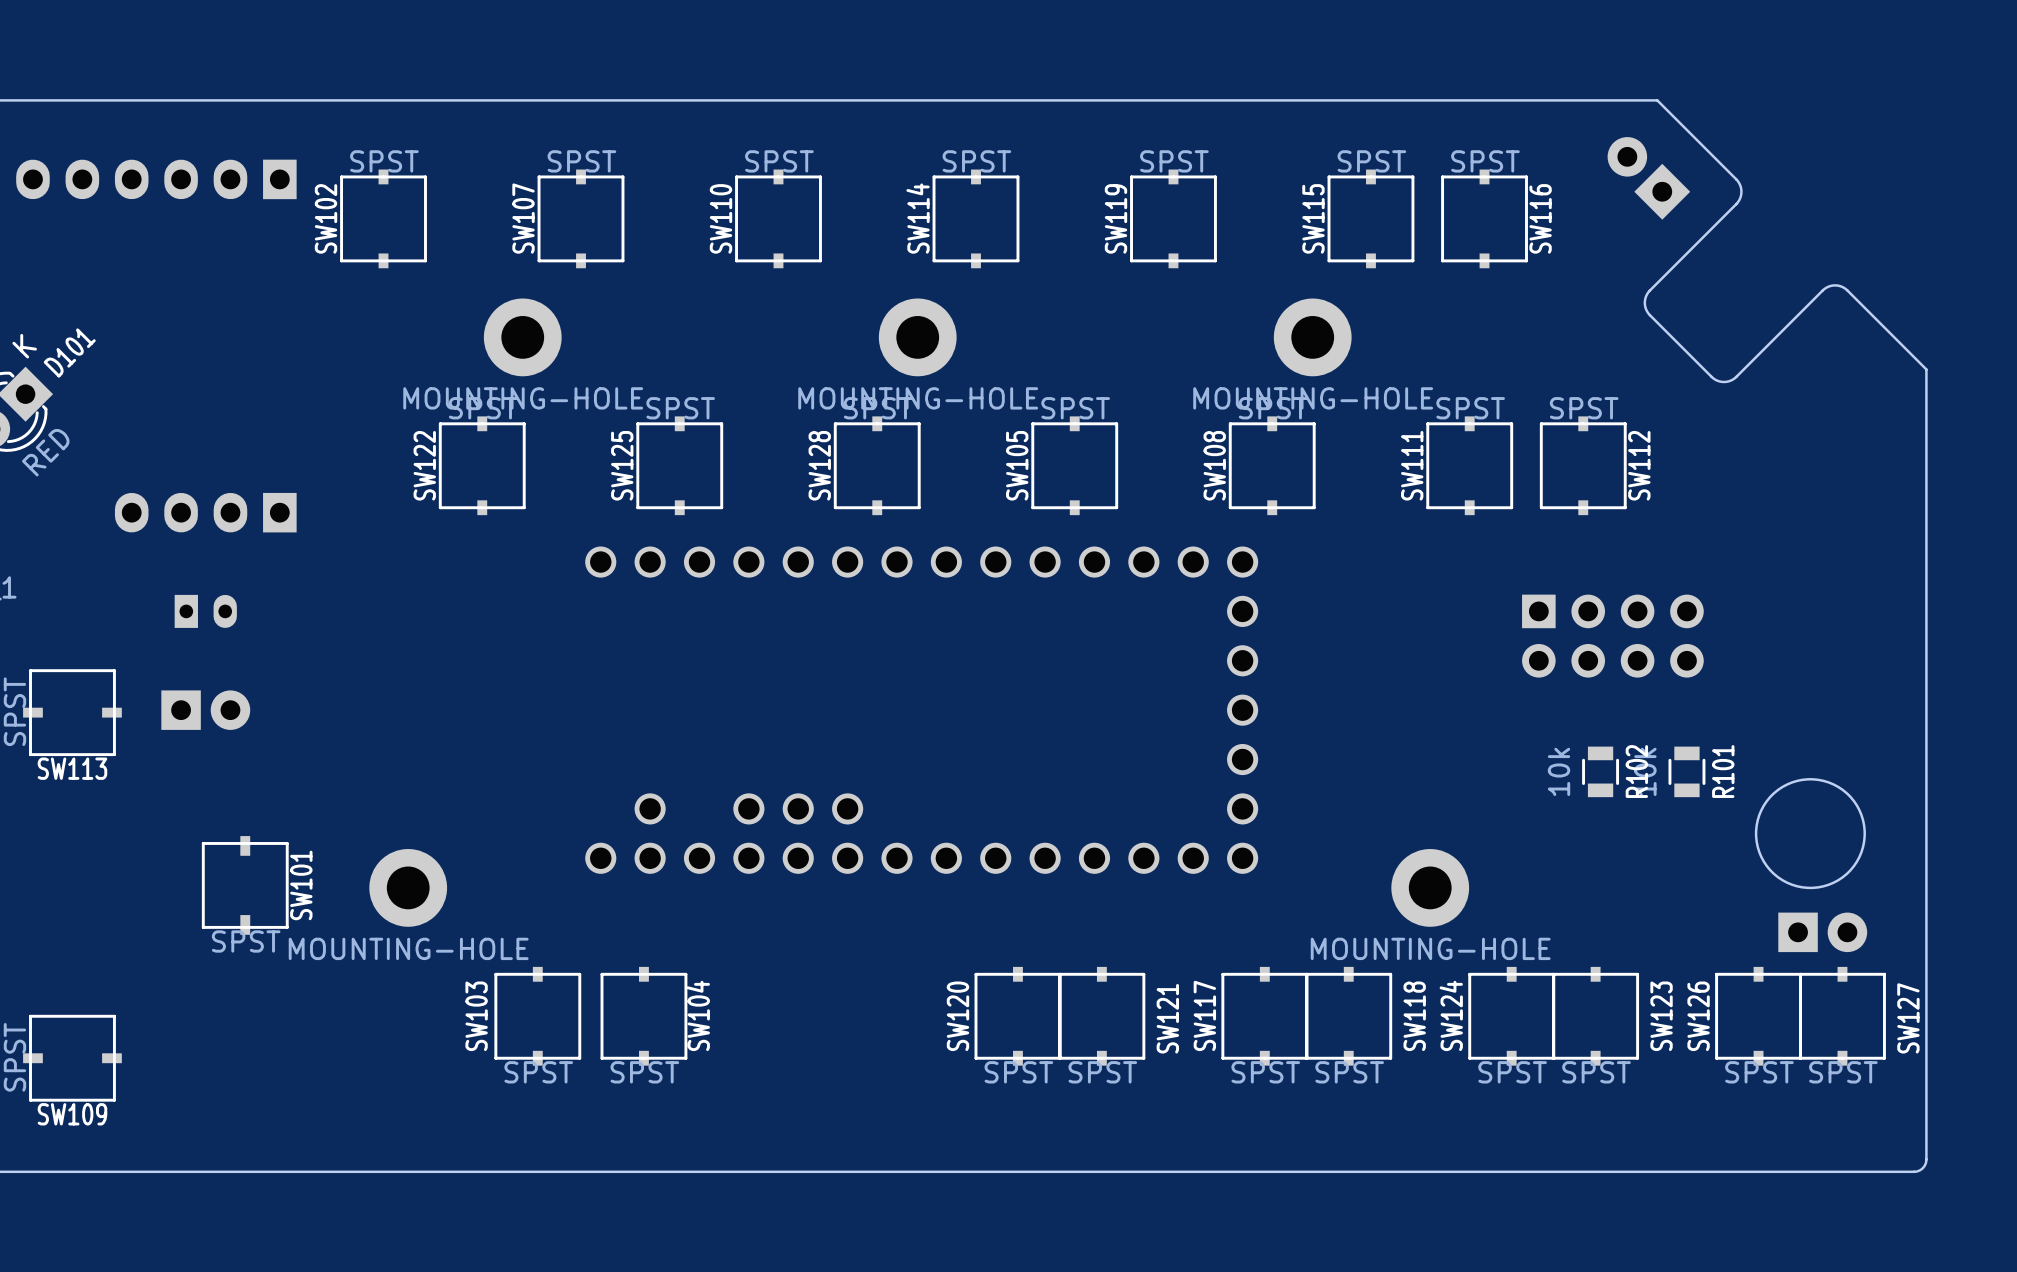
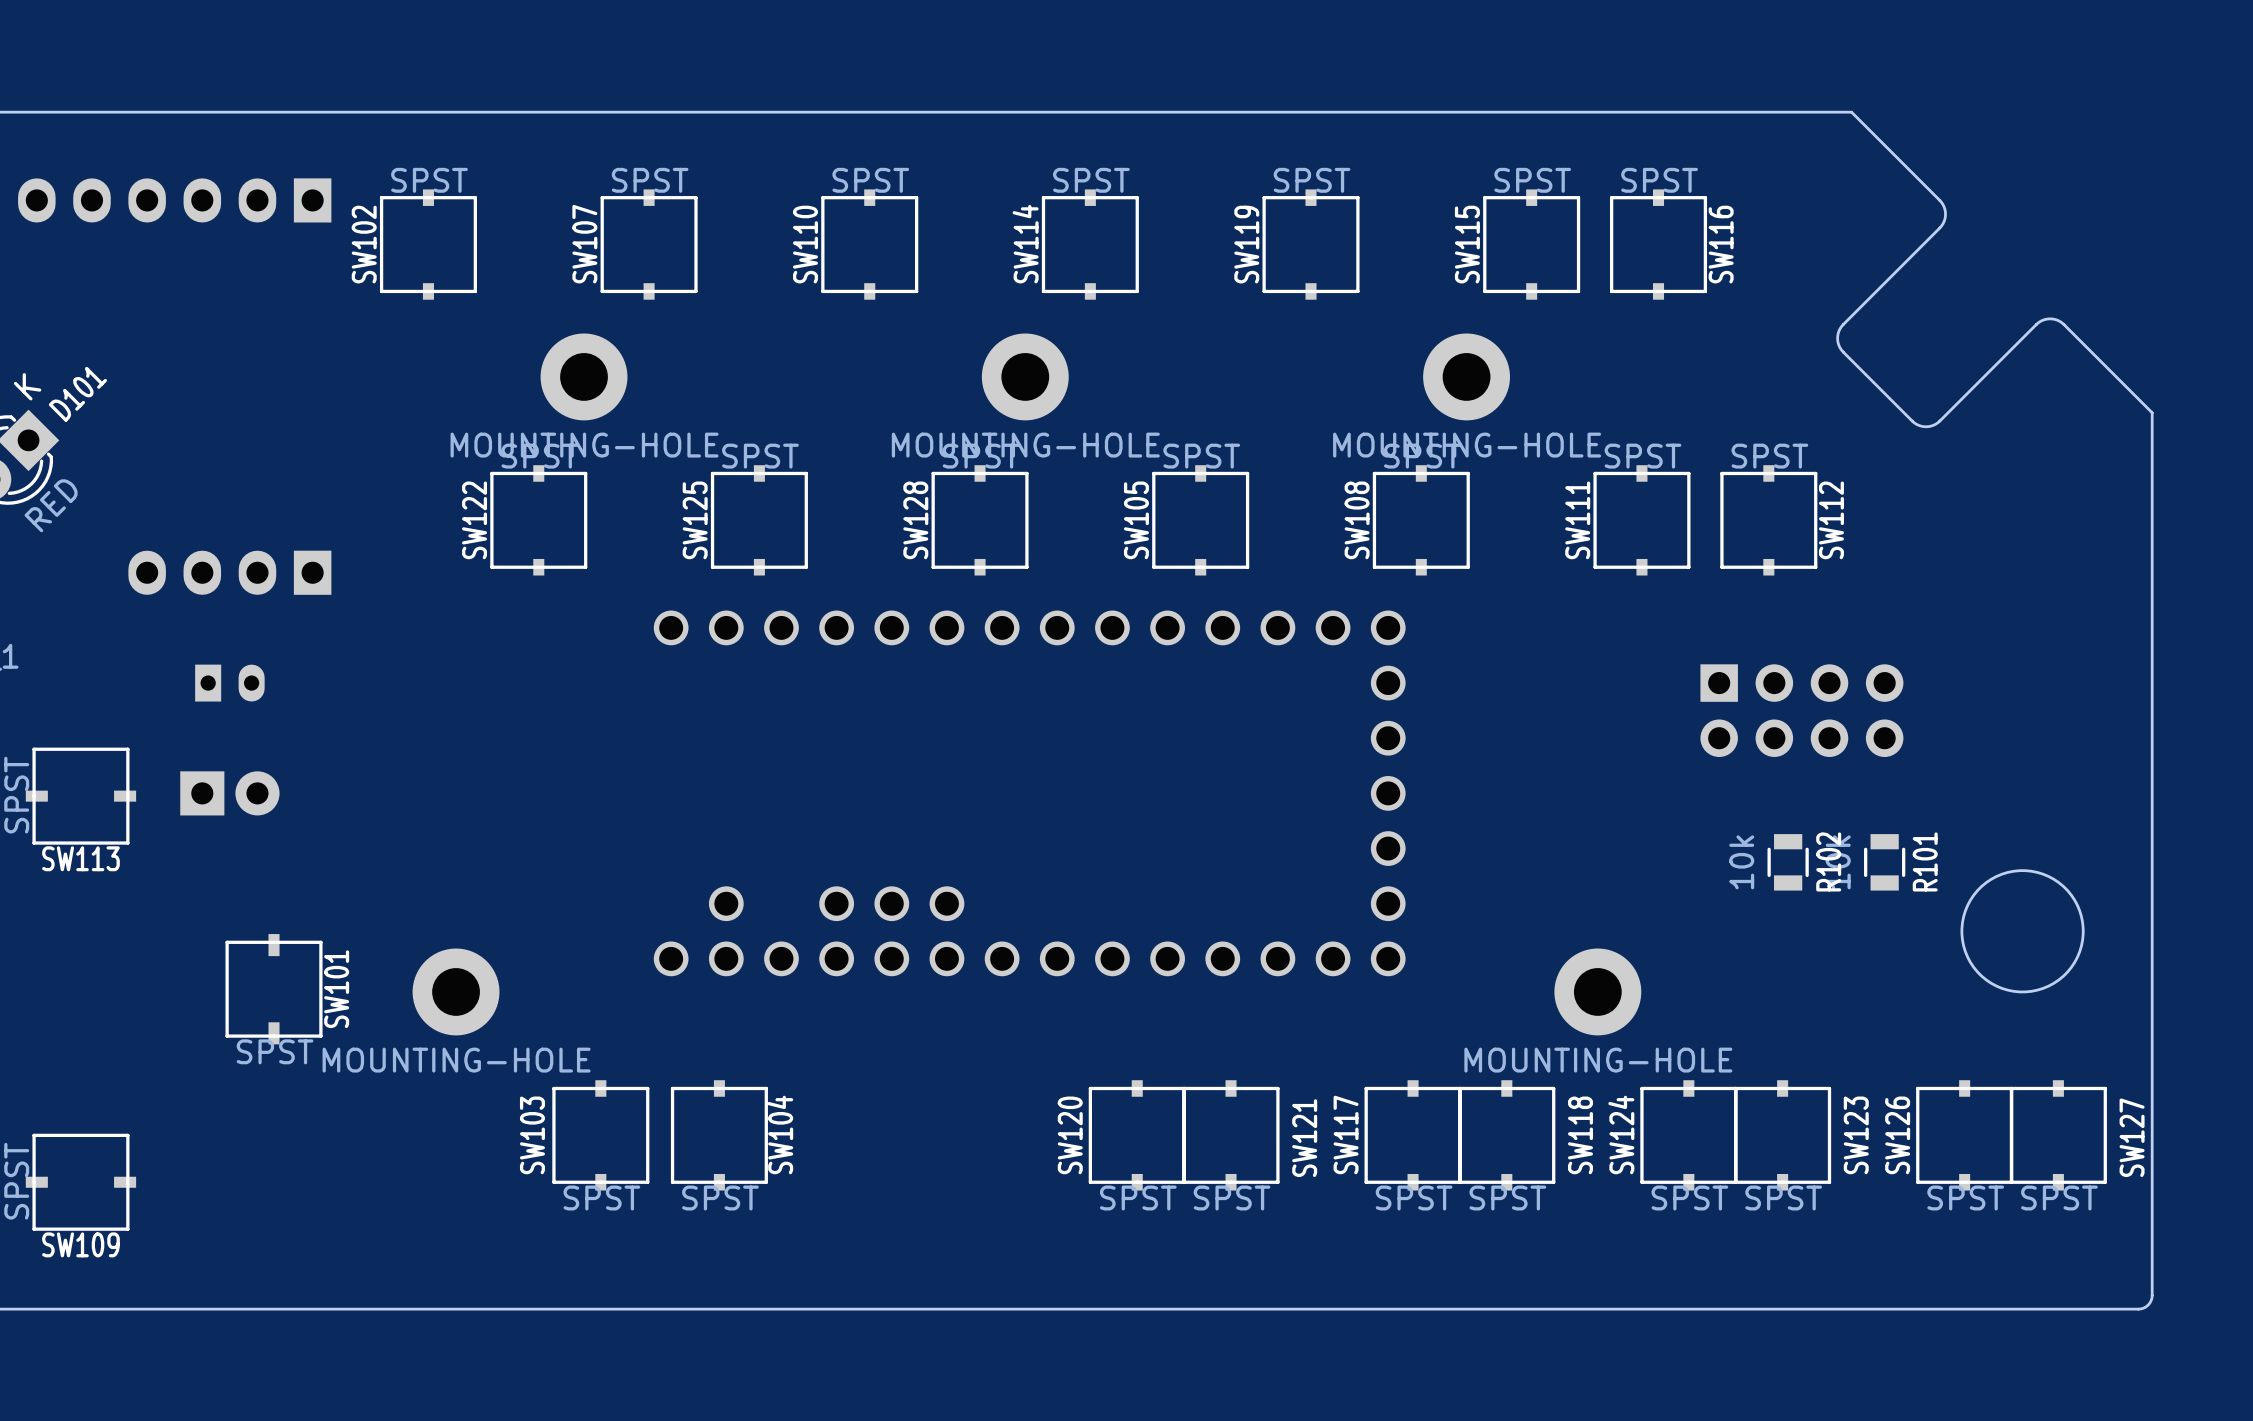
part: (1648, 178) -> none
part: (1822, 932) -> none

